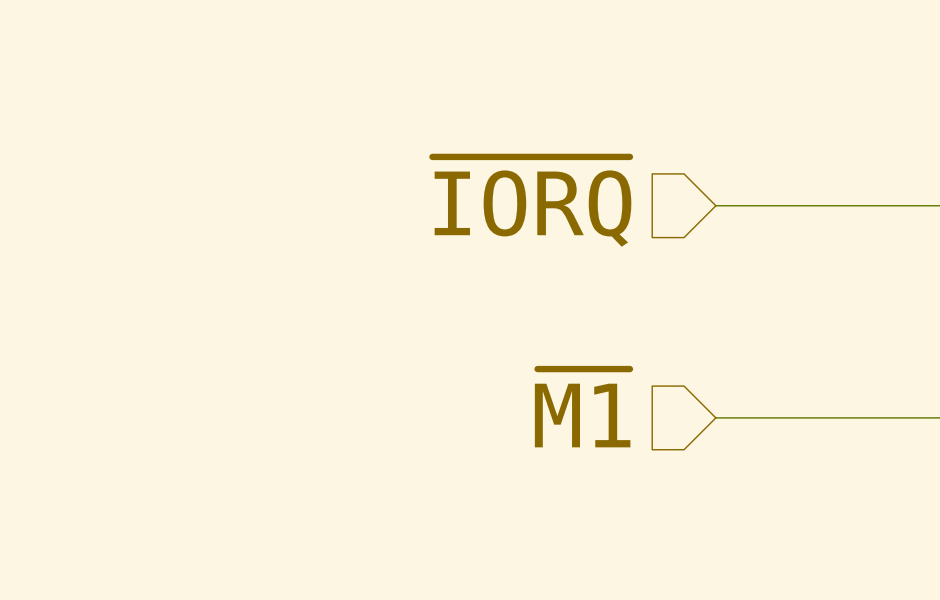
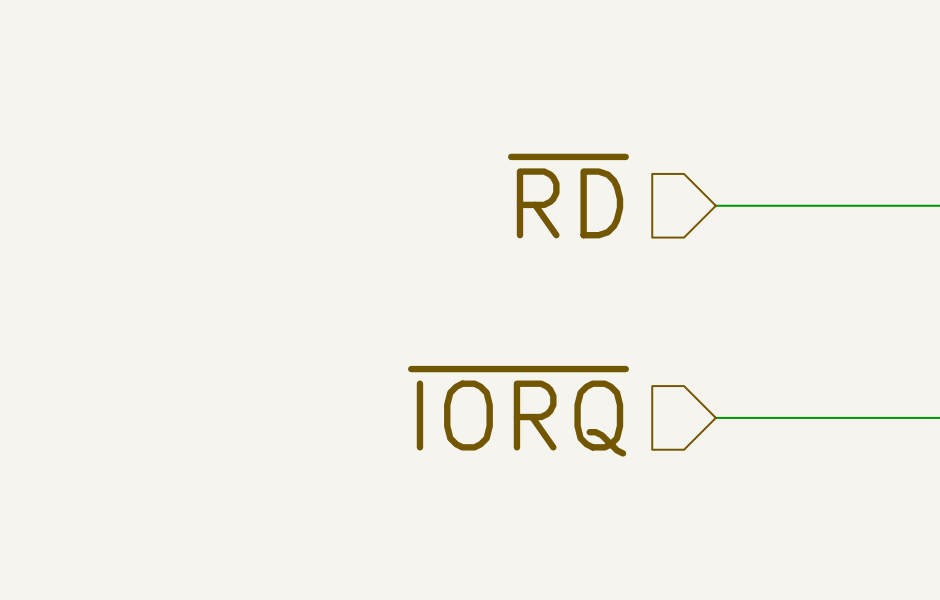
hierarchical label: ~{IORQ} (531, 201) -> ~{RD} (568, 196)
hierarchical label: ~{M1} (582, 408) -> ~{IORQ} (518, 411)

